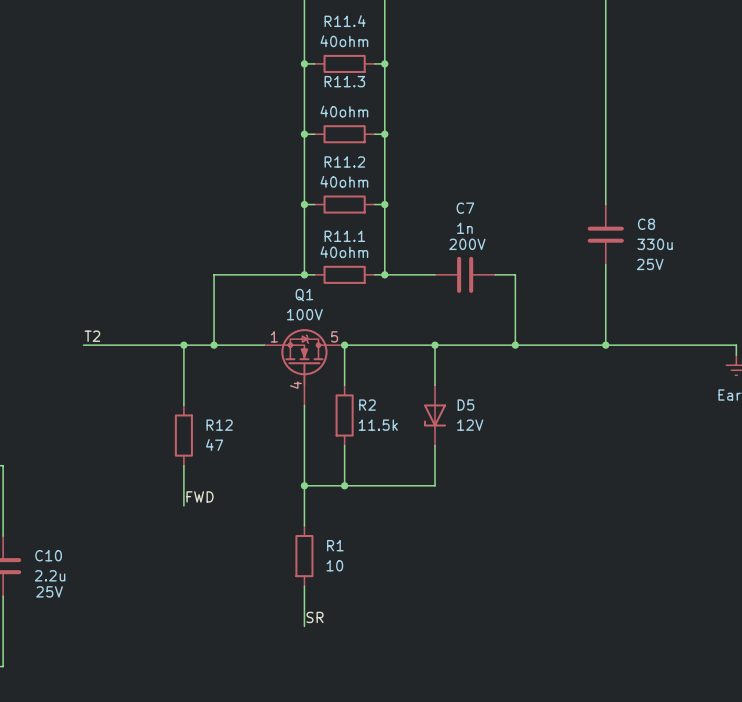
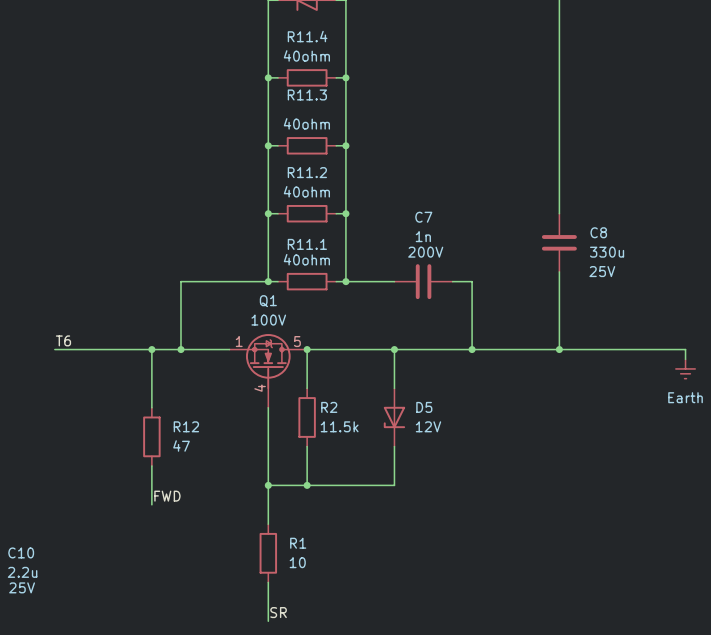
label: T2 (92, 336) -> T6 (63, 340)

